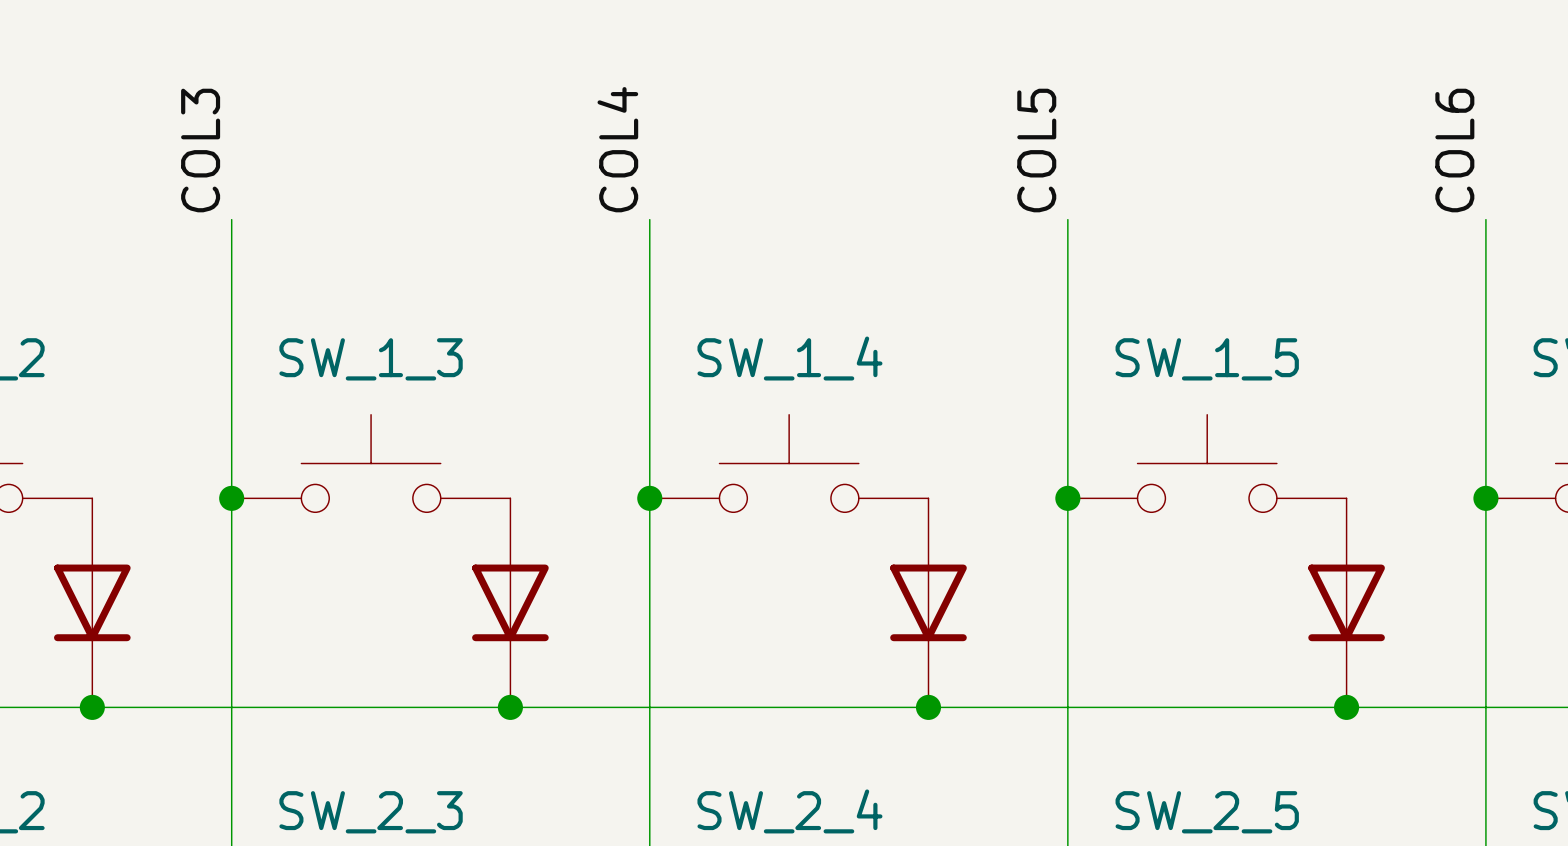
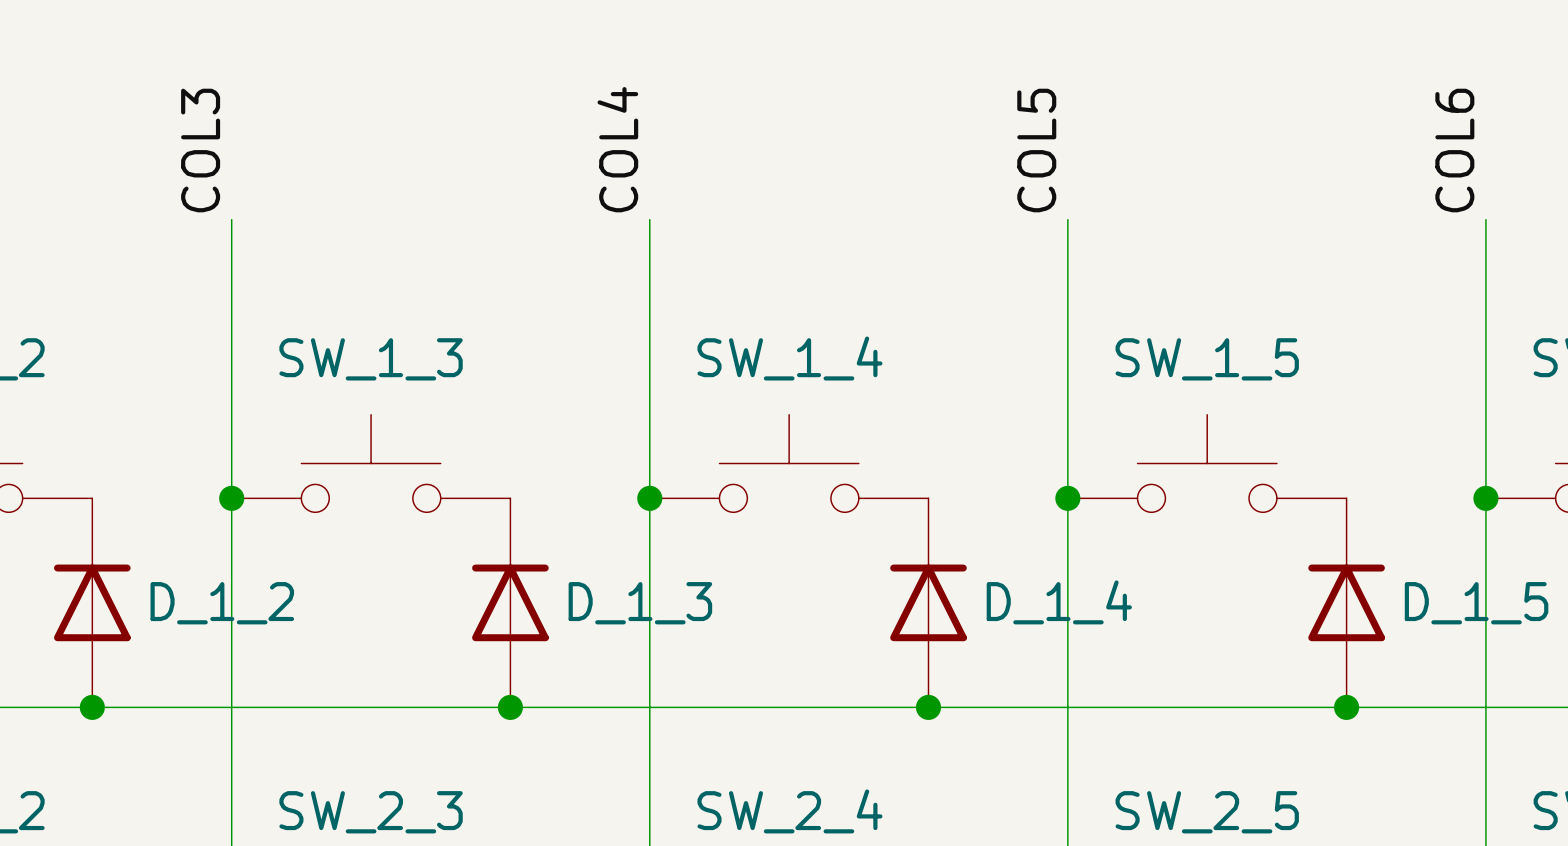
part: (92, 602) -> none
D_1_2: none -> (92, 602)
part: (510, 602) -> none
D_1_3: none -> (510, 602)
part: (928, 602) -> none
D_1_4: none -> (928, 602)
part: (1346, 602) -> none
D_1_5: none -> (1346, 602)

